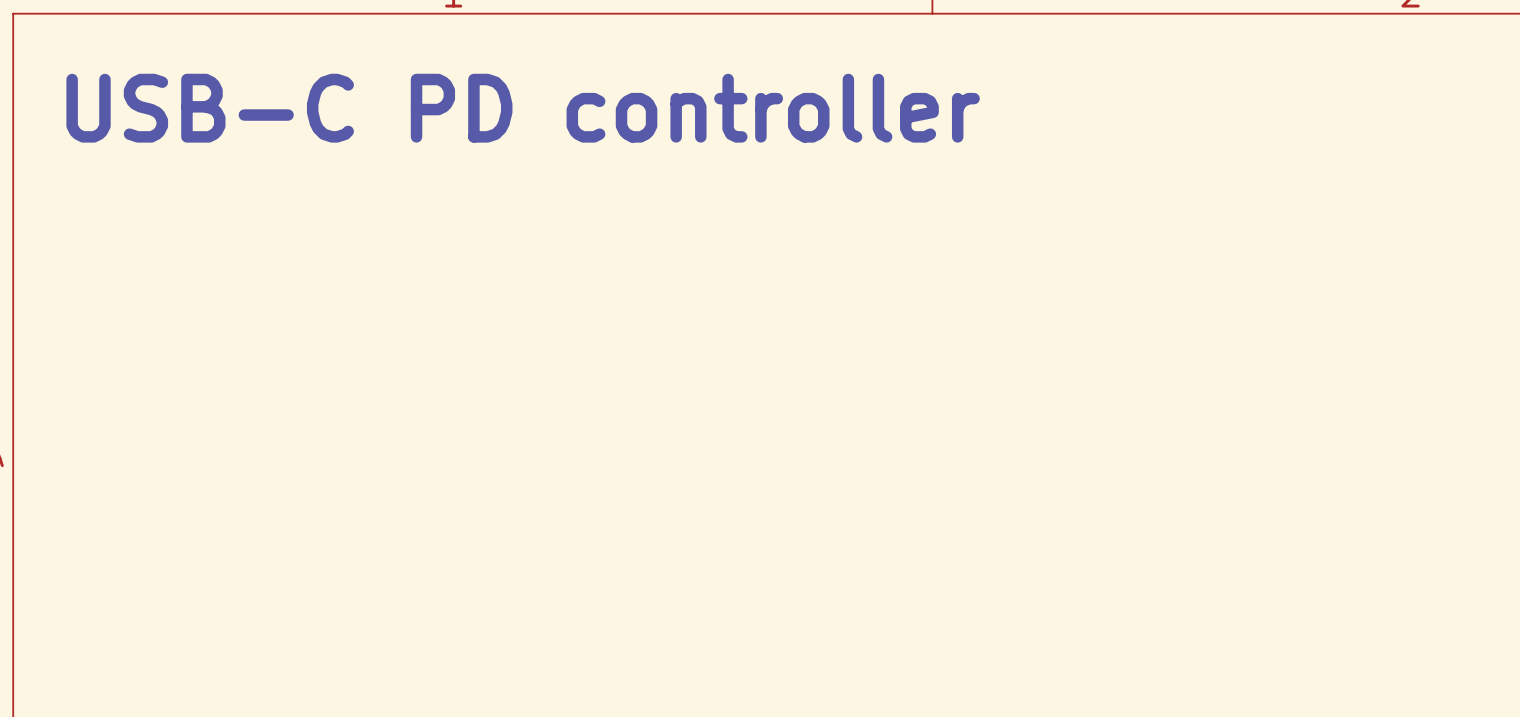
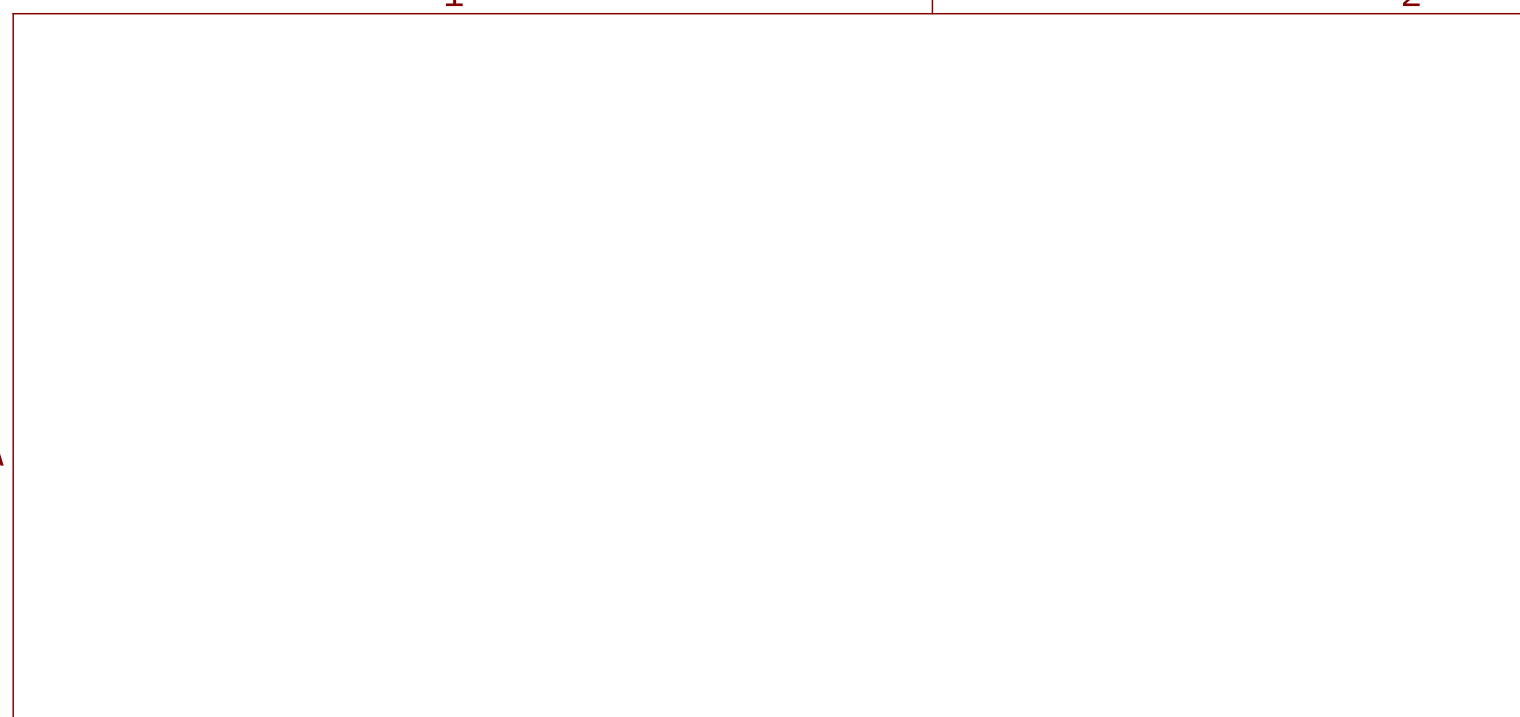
text: USB-C PD controller (523, 108) -> none

